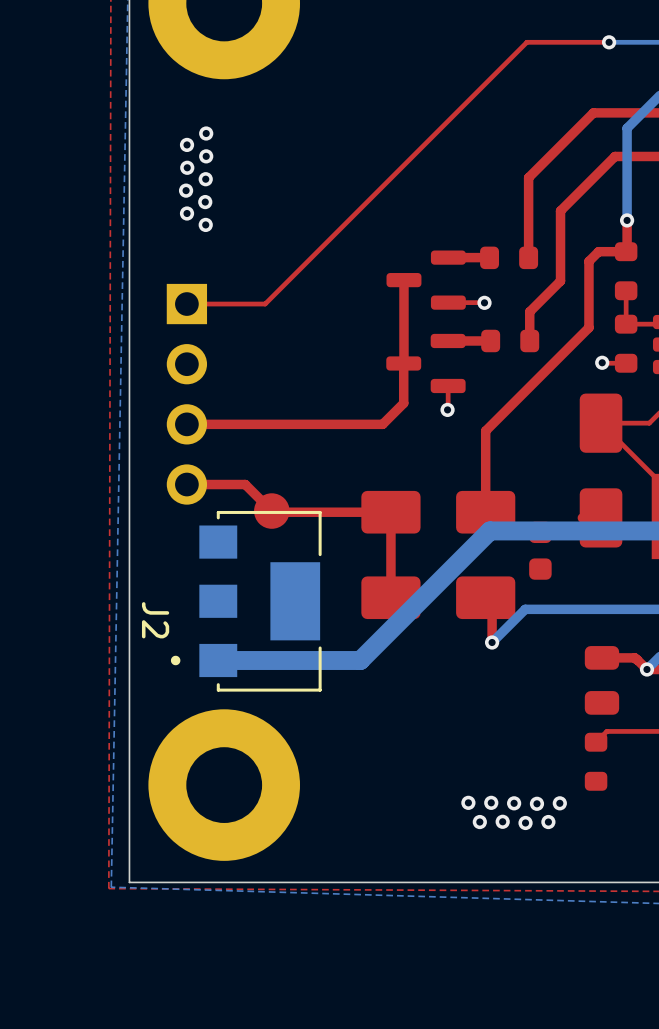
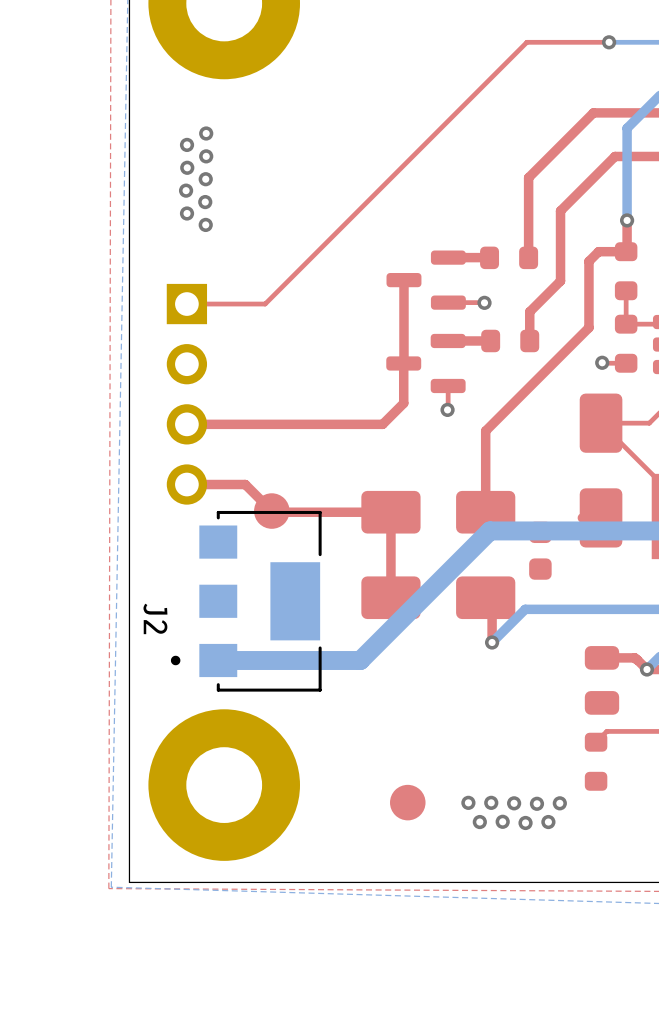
part: none -> (407, 802)

